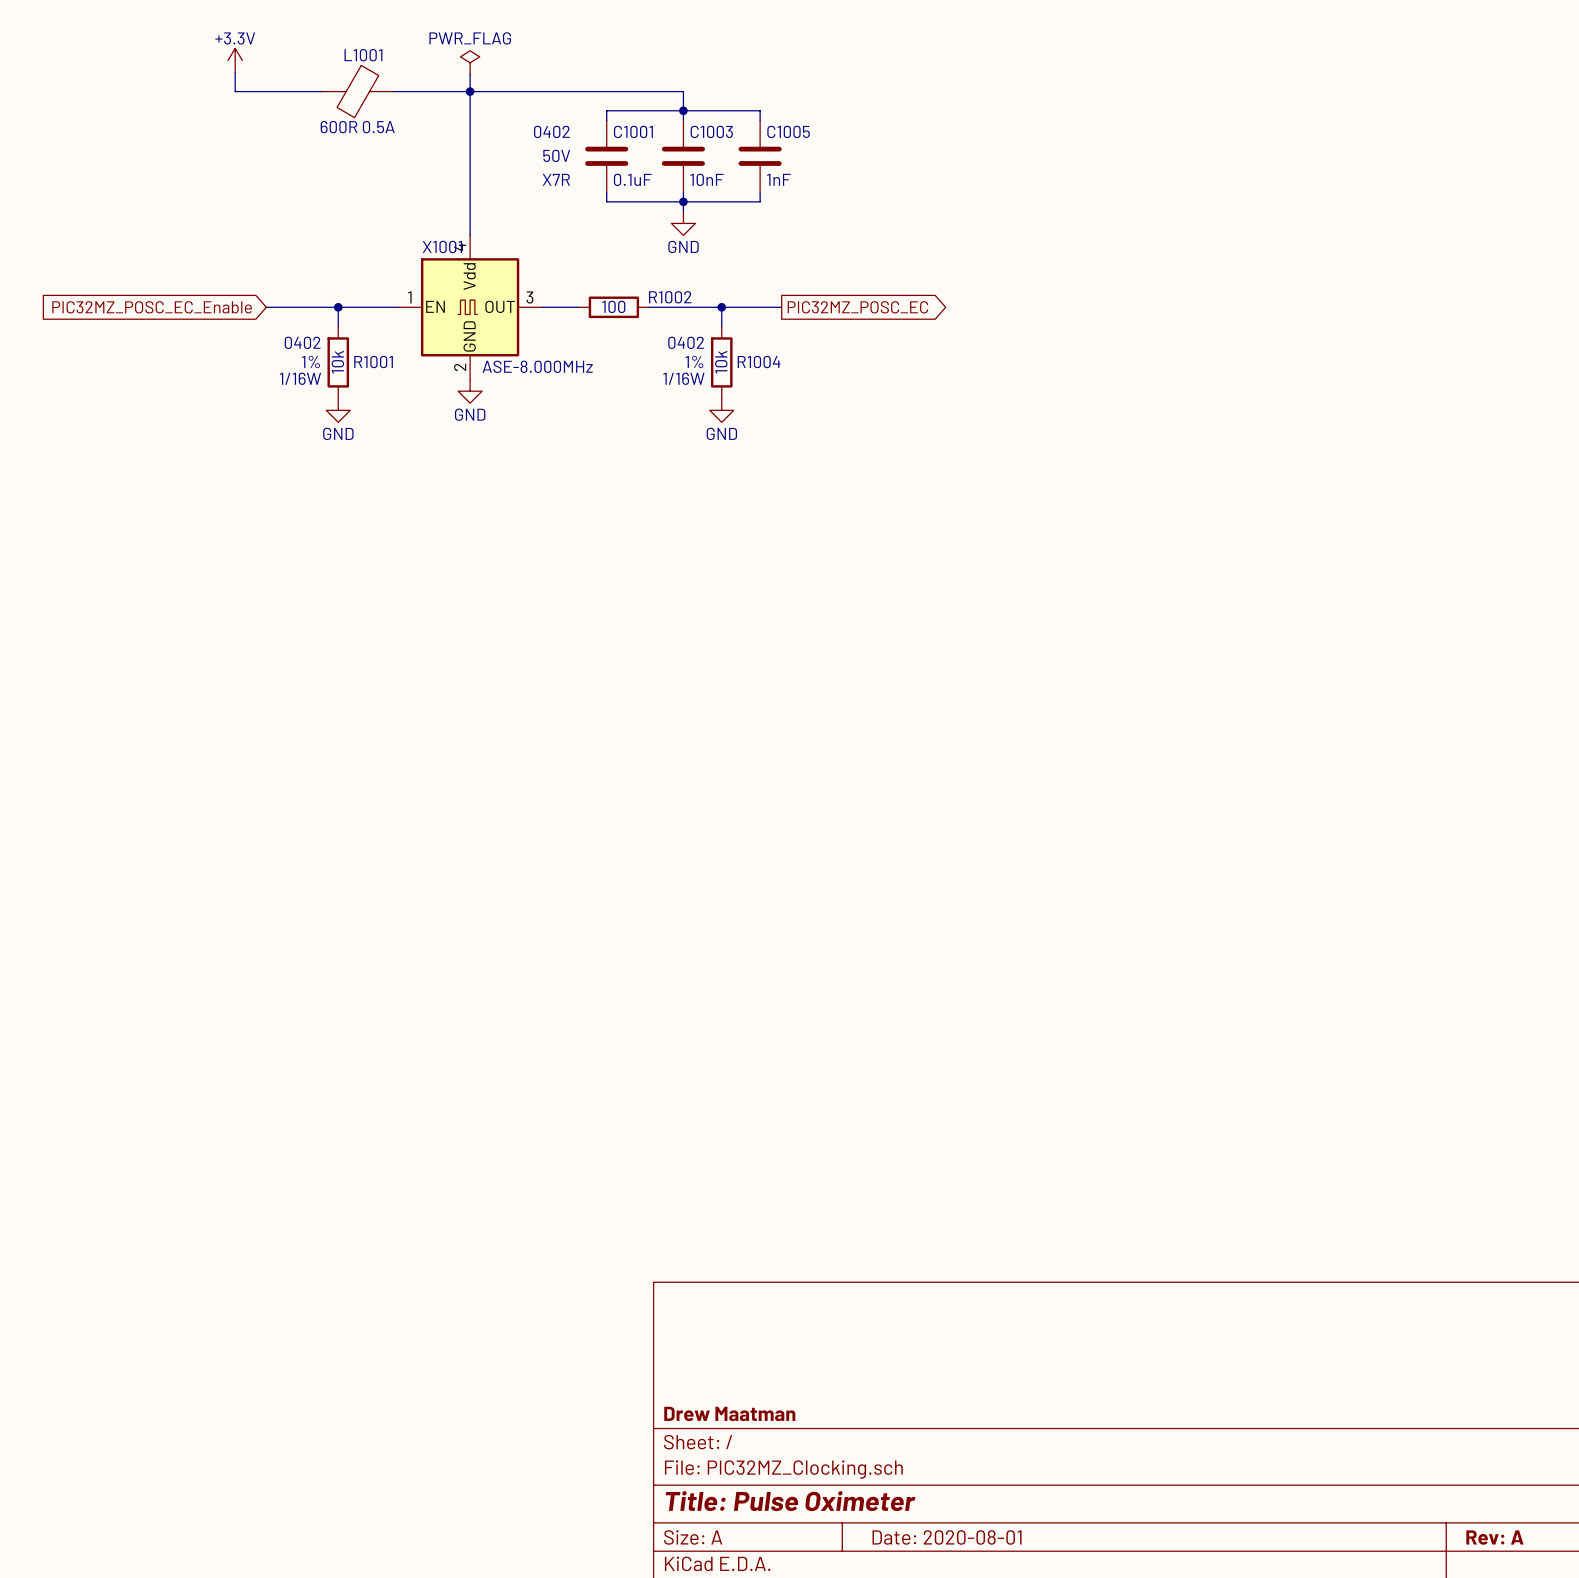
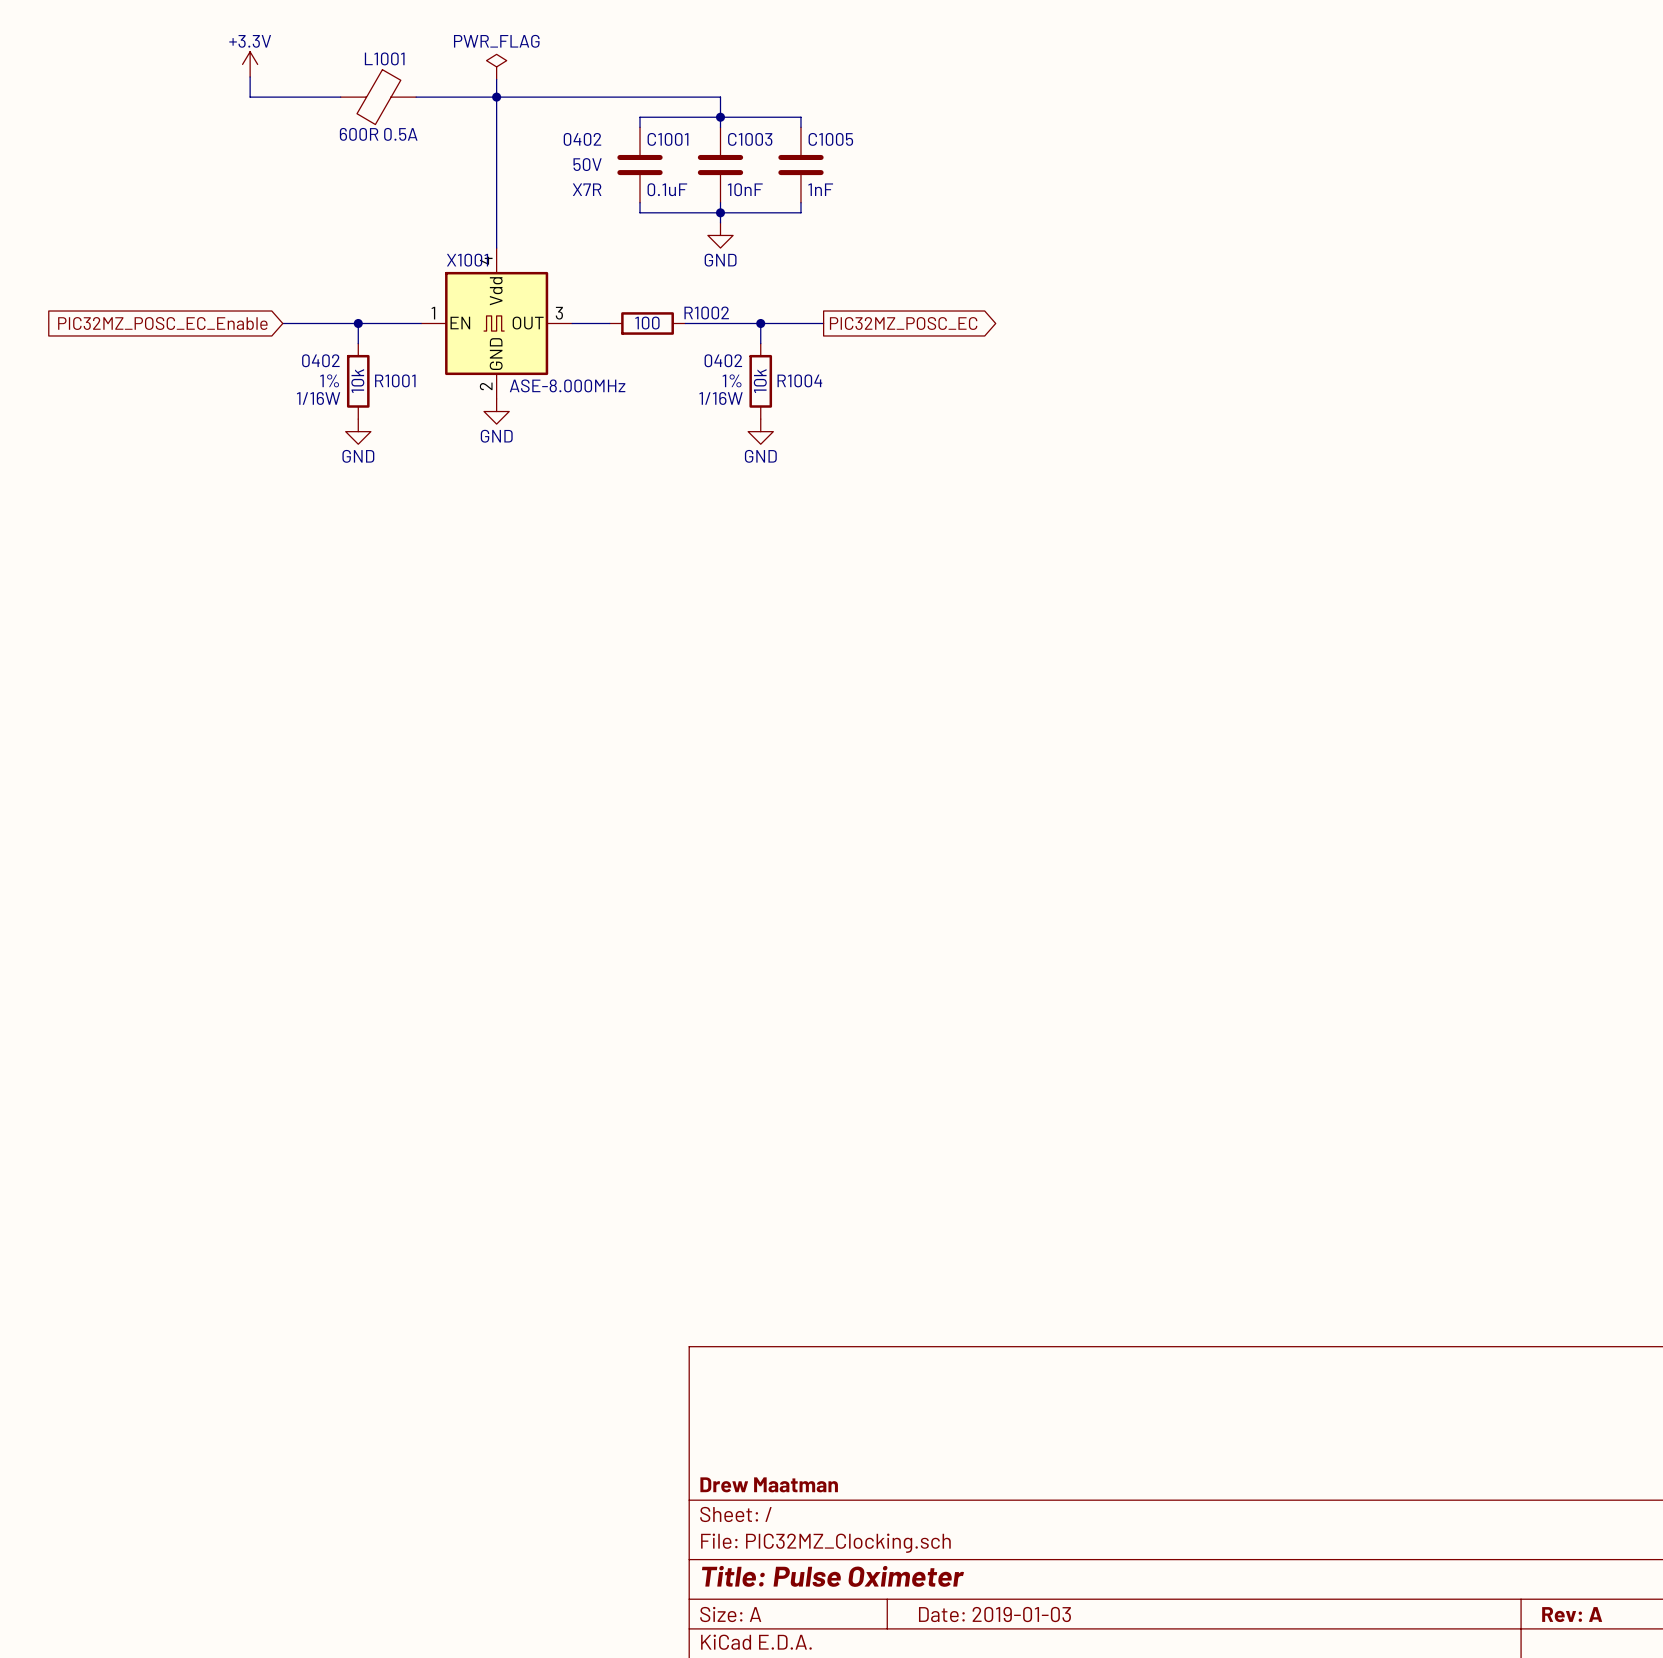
title block: Date: 2020-08-01 (947, 1537) -> Date: 2019-01-03 (994, 1614)

